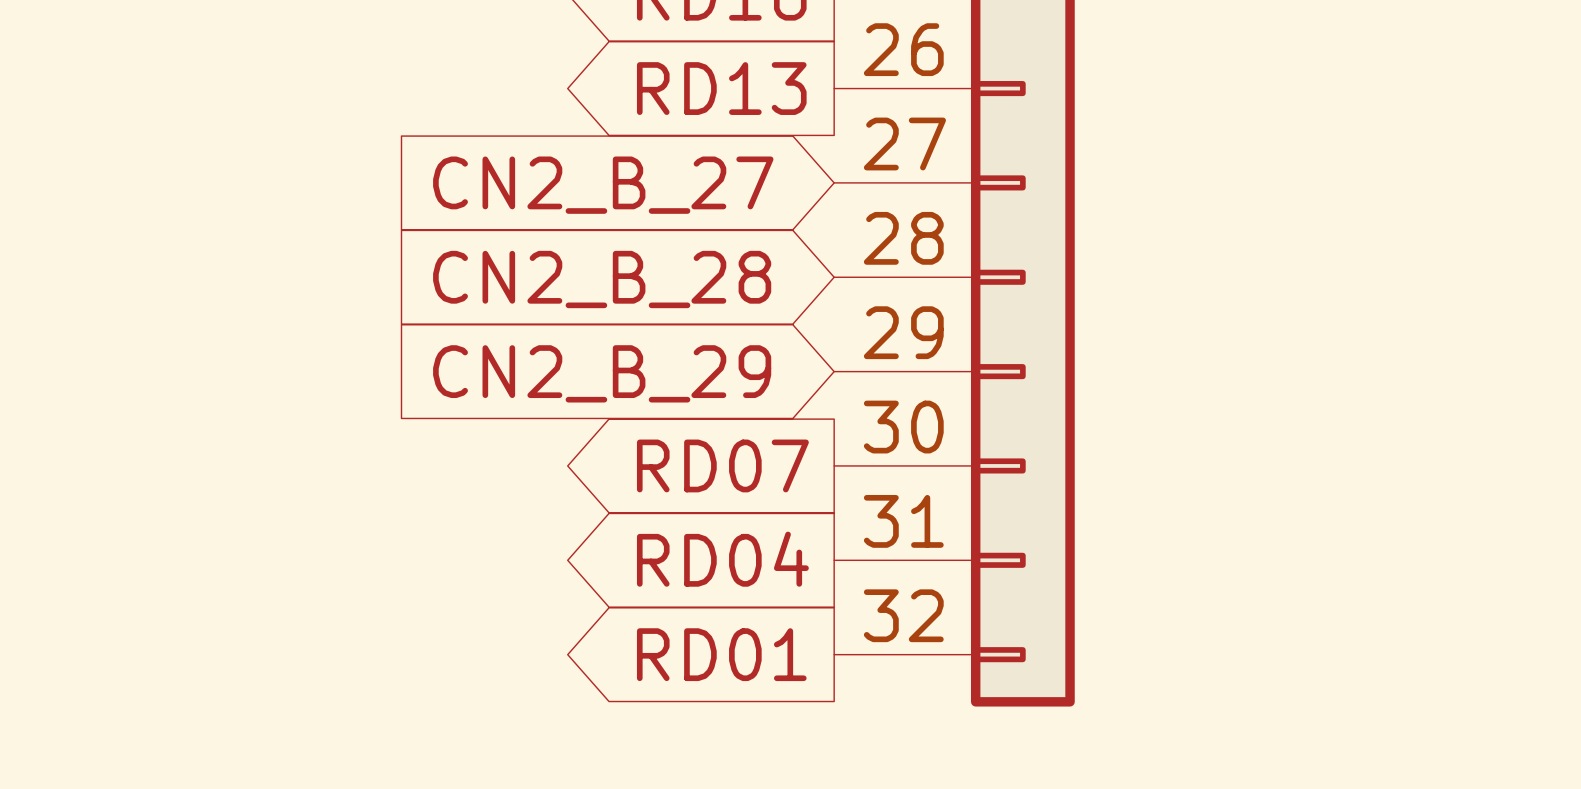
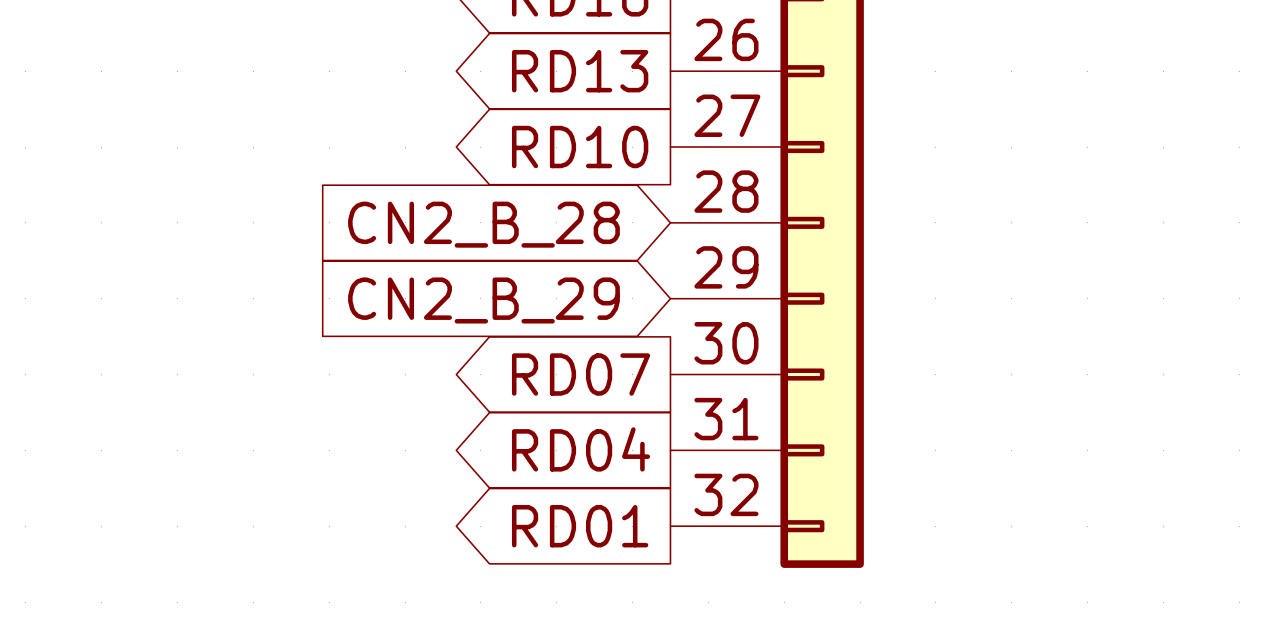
global label shape: input (603, 185) -> output (580, 147)
global label: CN2_B_27 (603, 185) -> RD10 (580, 147)

